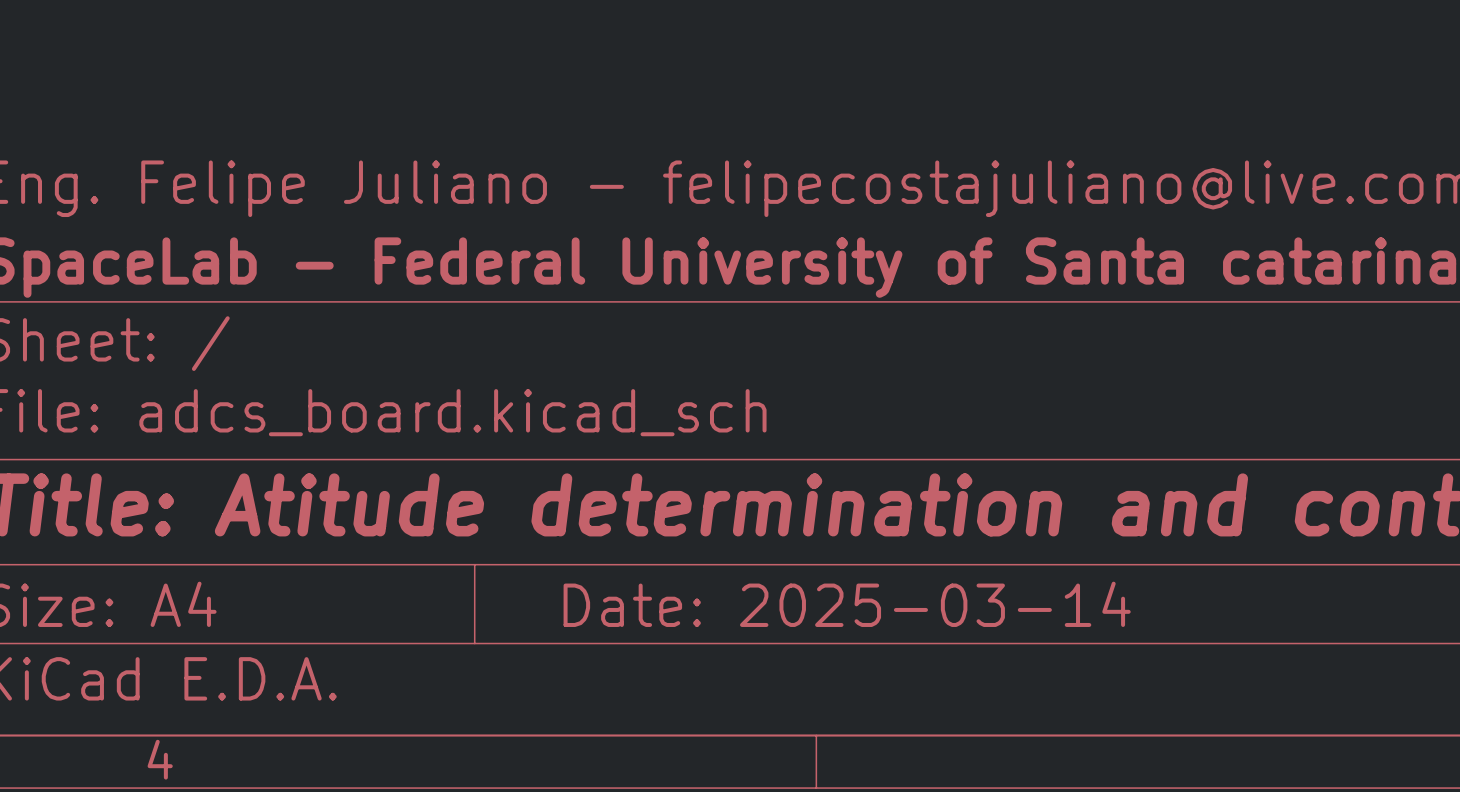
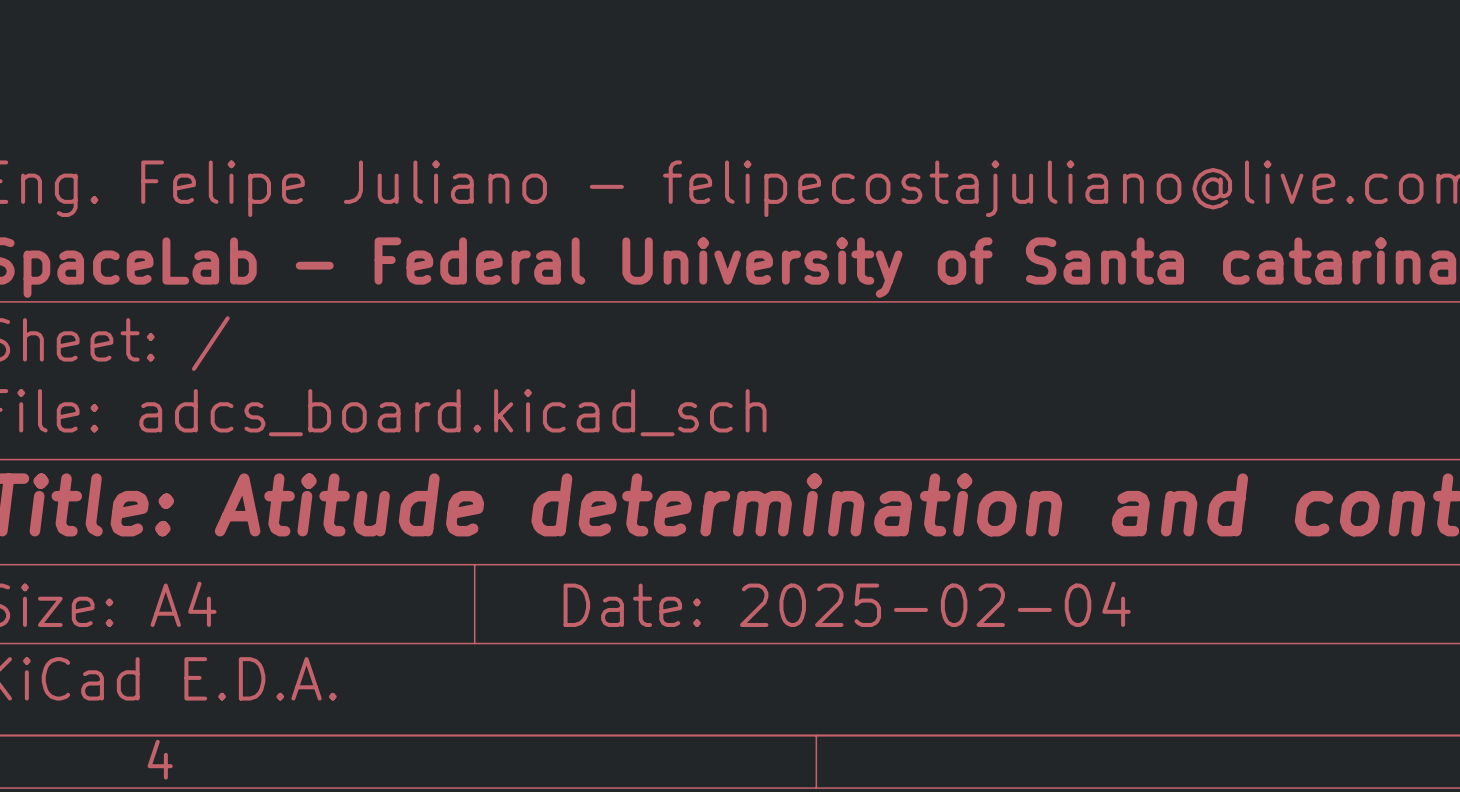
title block: Date: 2025-03-14 (847, 604) -> Date: 2025-02-04 (847, 604)

